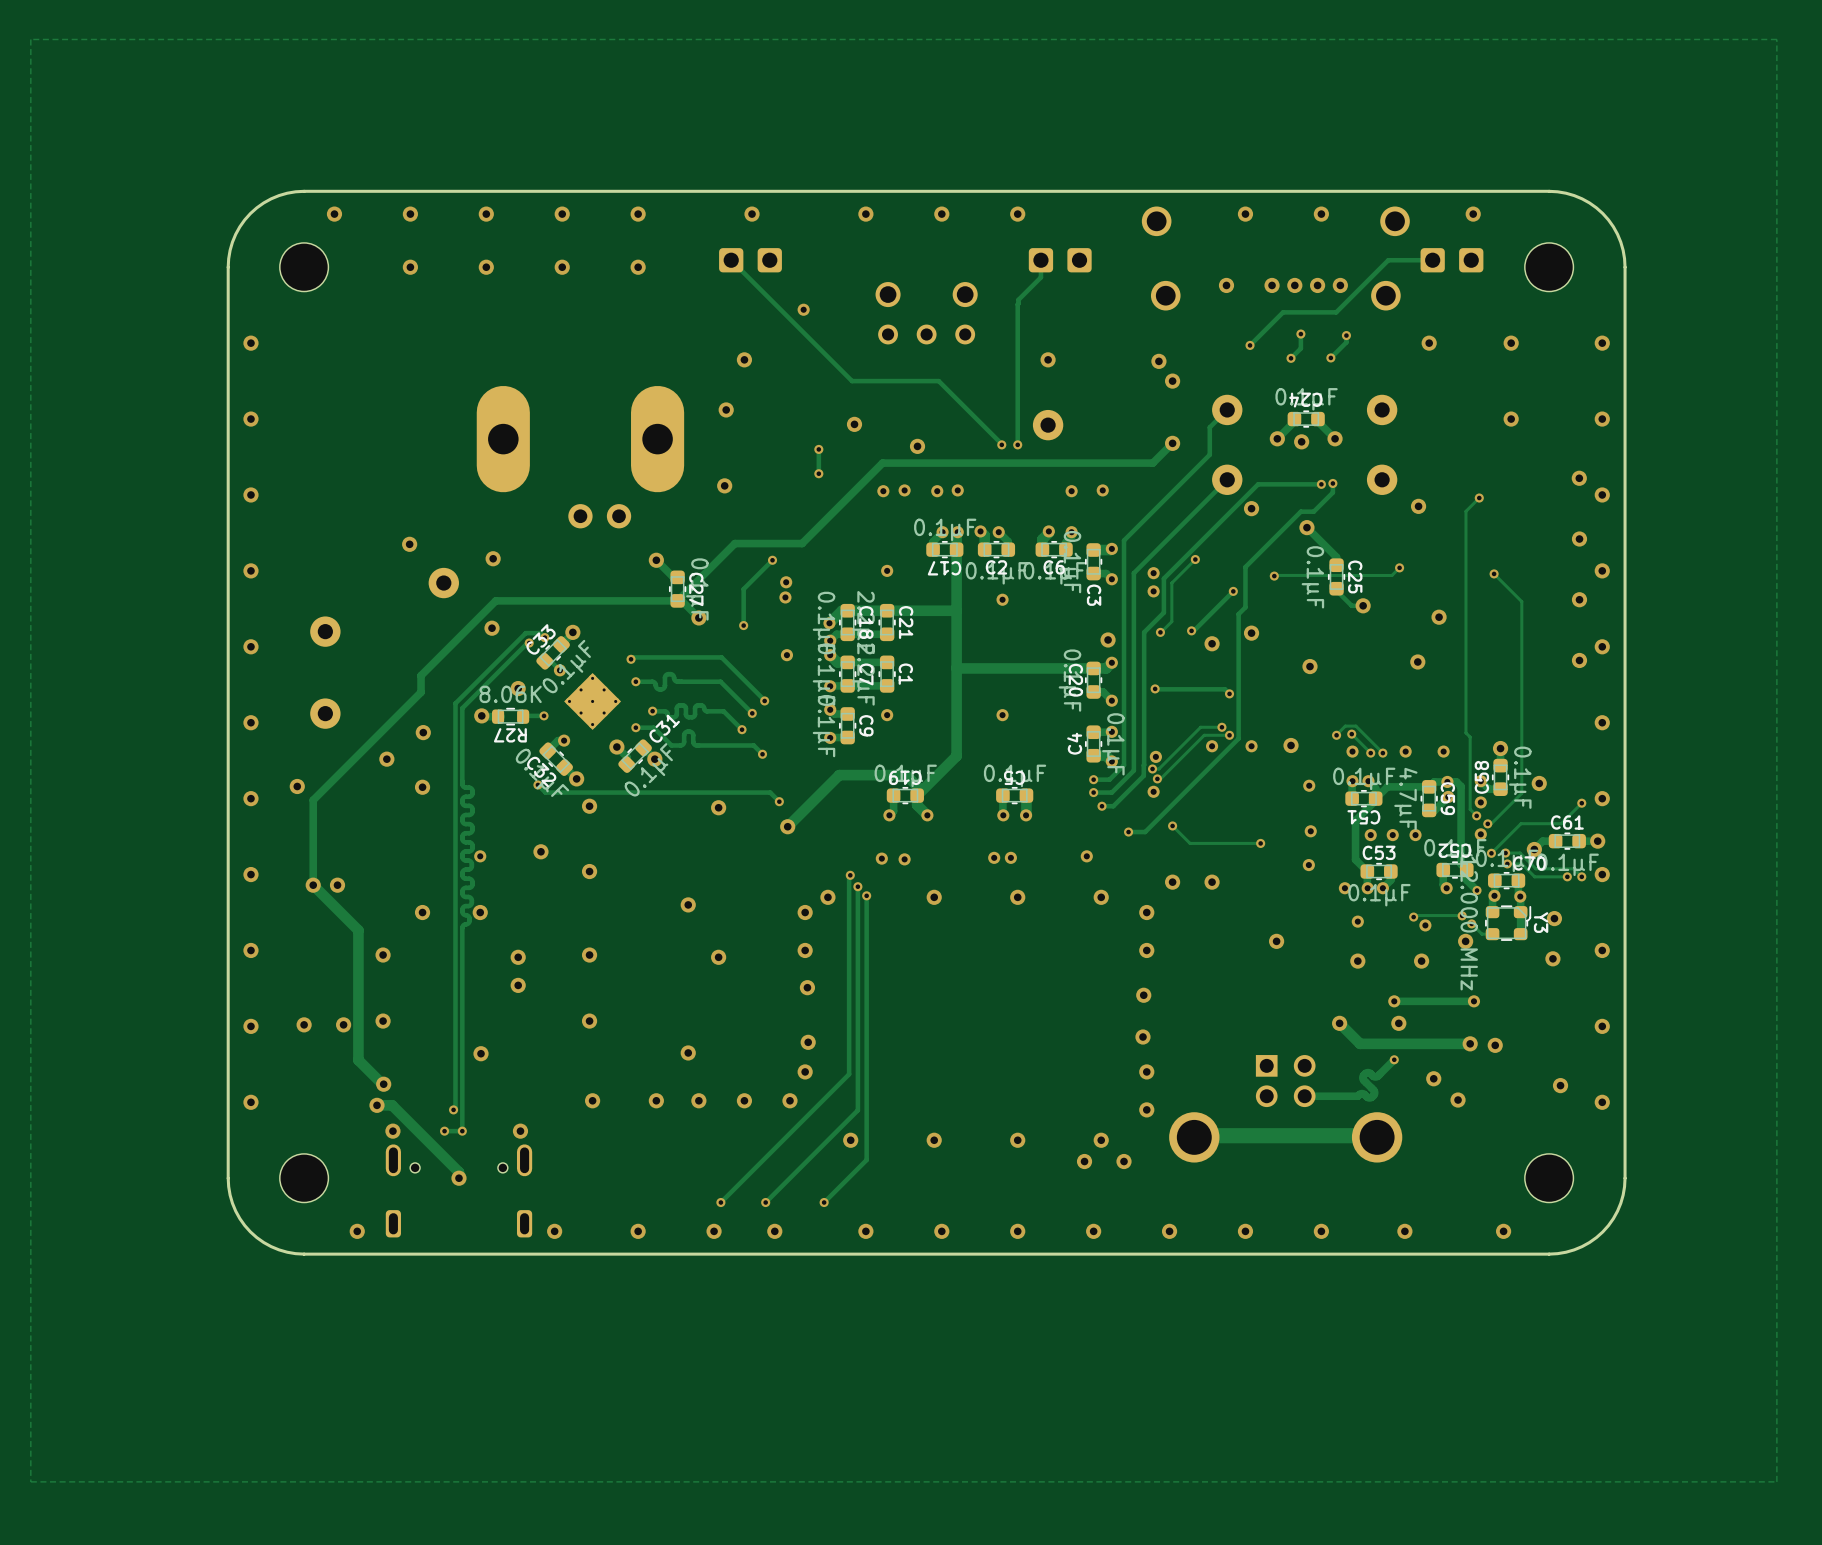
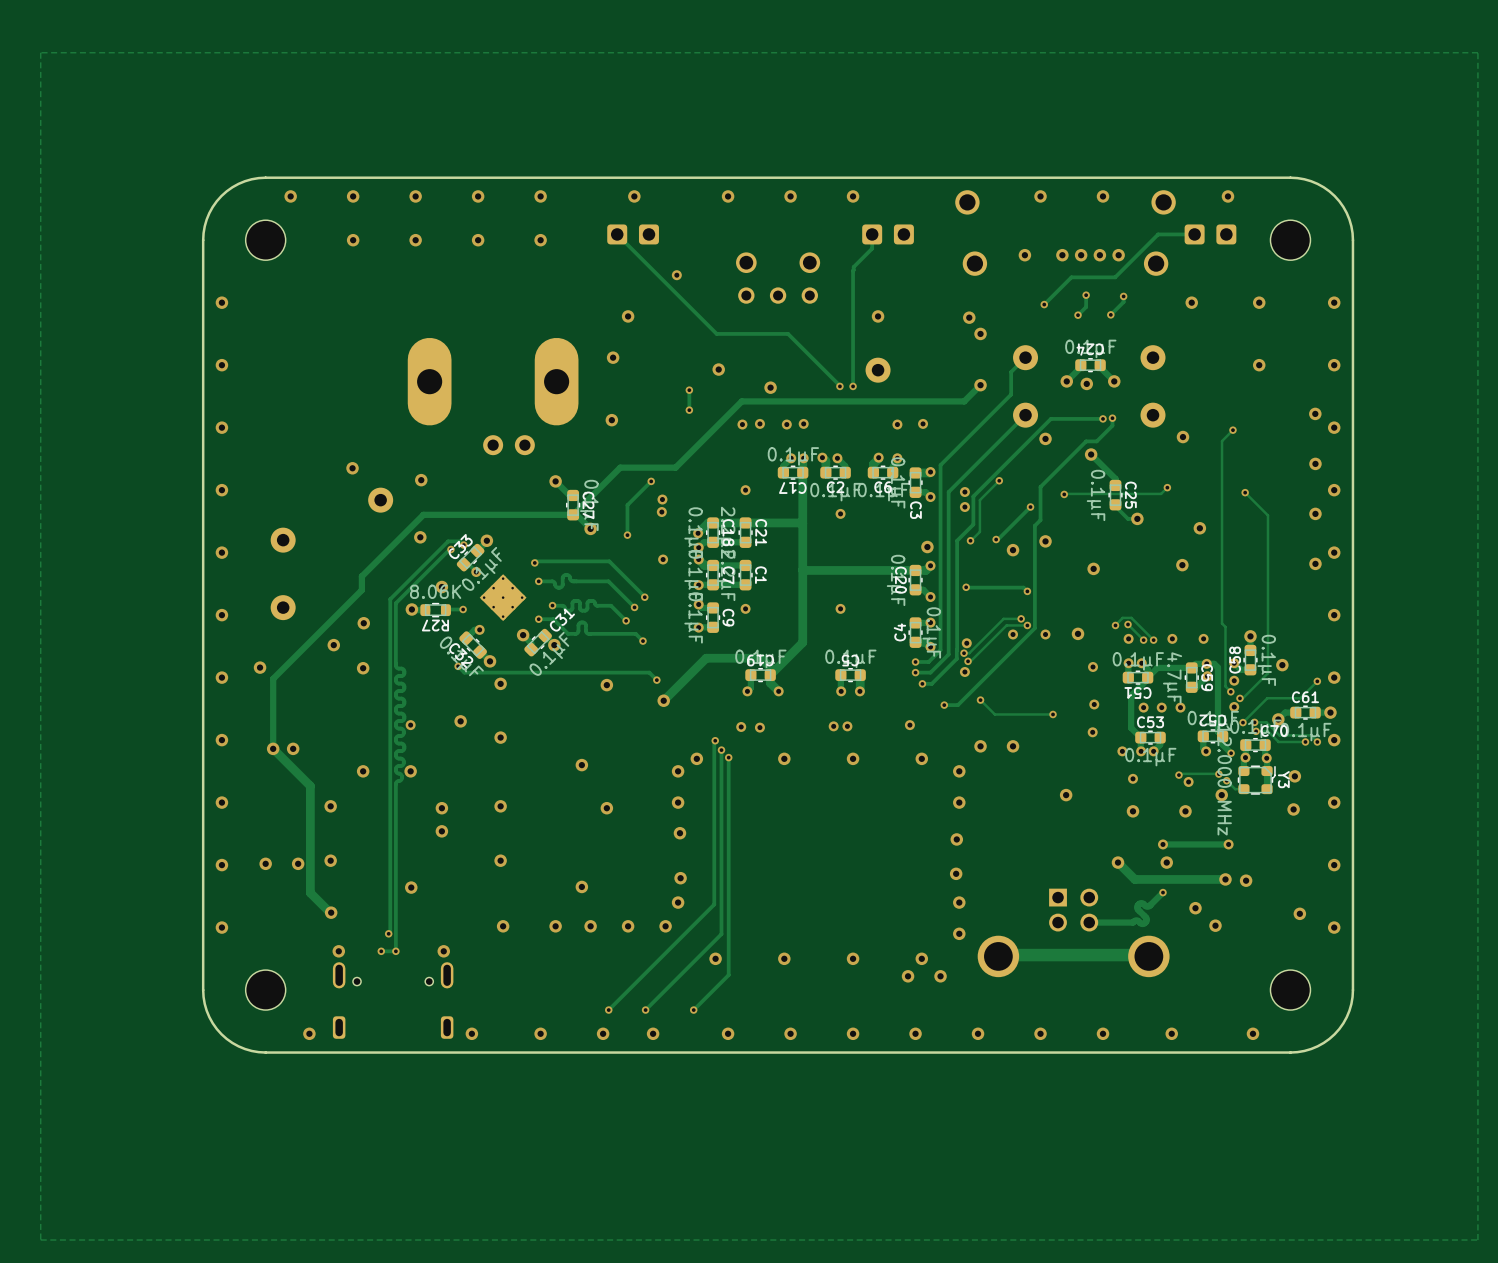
track: (376, 1105) (392, 1105) (458, 1172) (458, 1178) -> none
via: (376, 1105) -> none
via: (458, 1178) -> none

